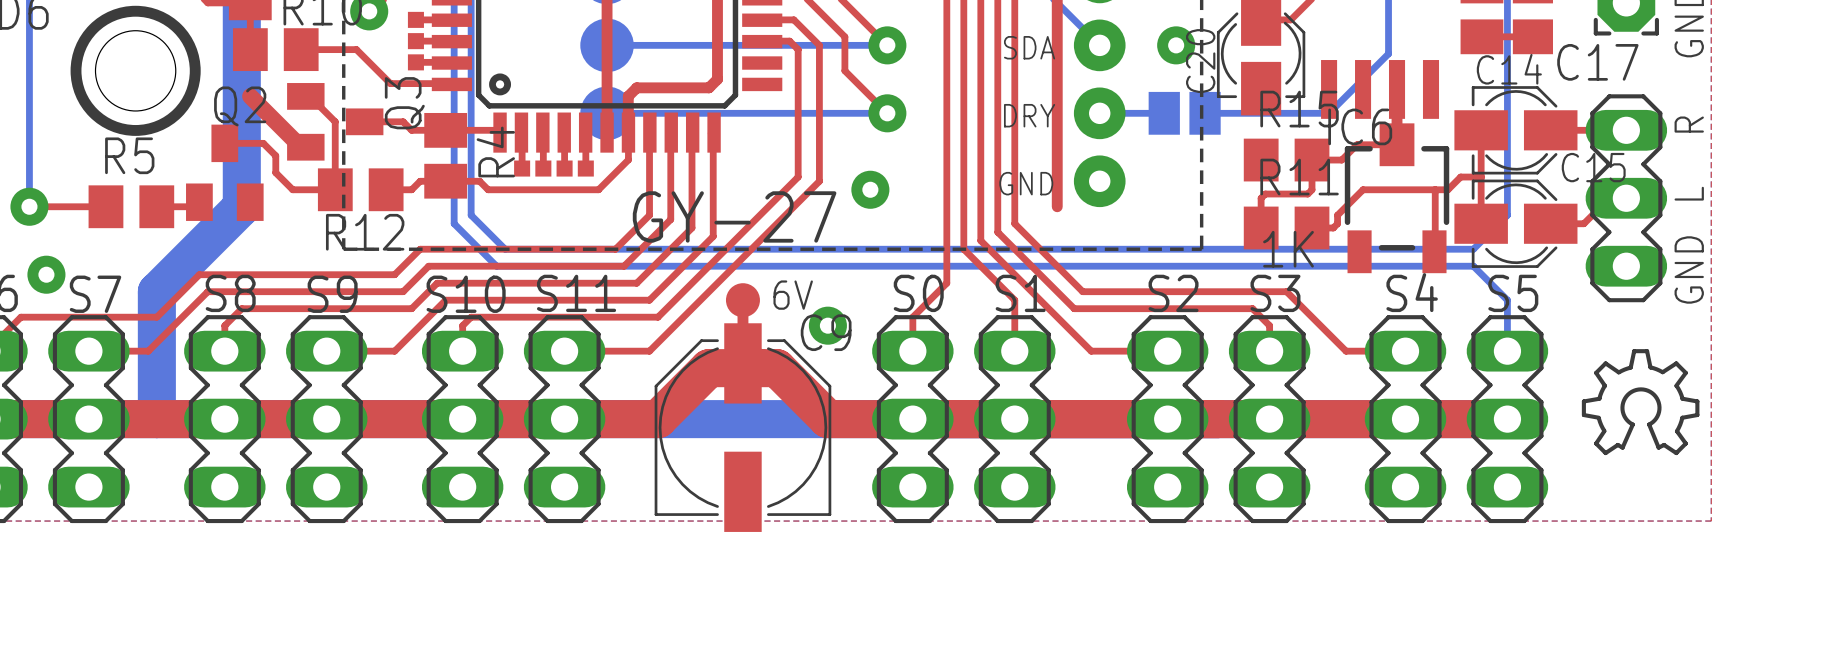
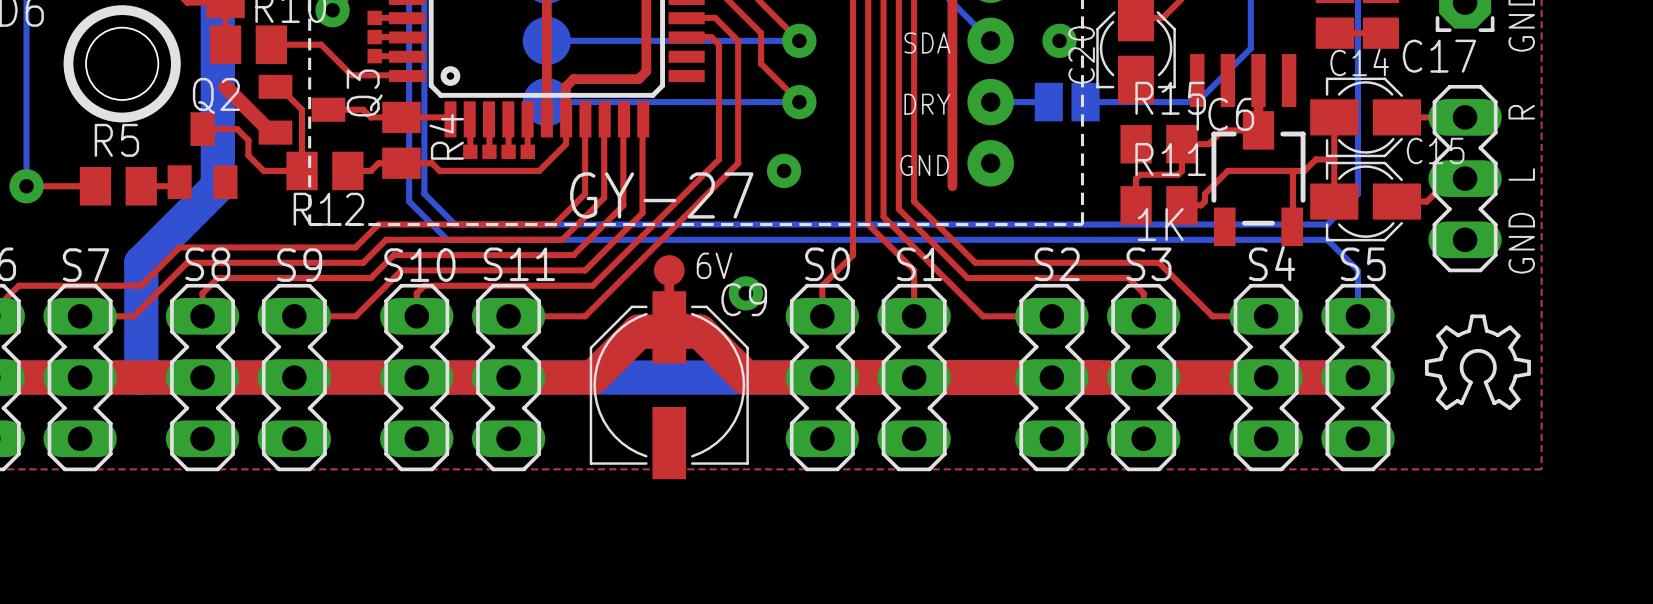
via: (46, 274) -> none

